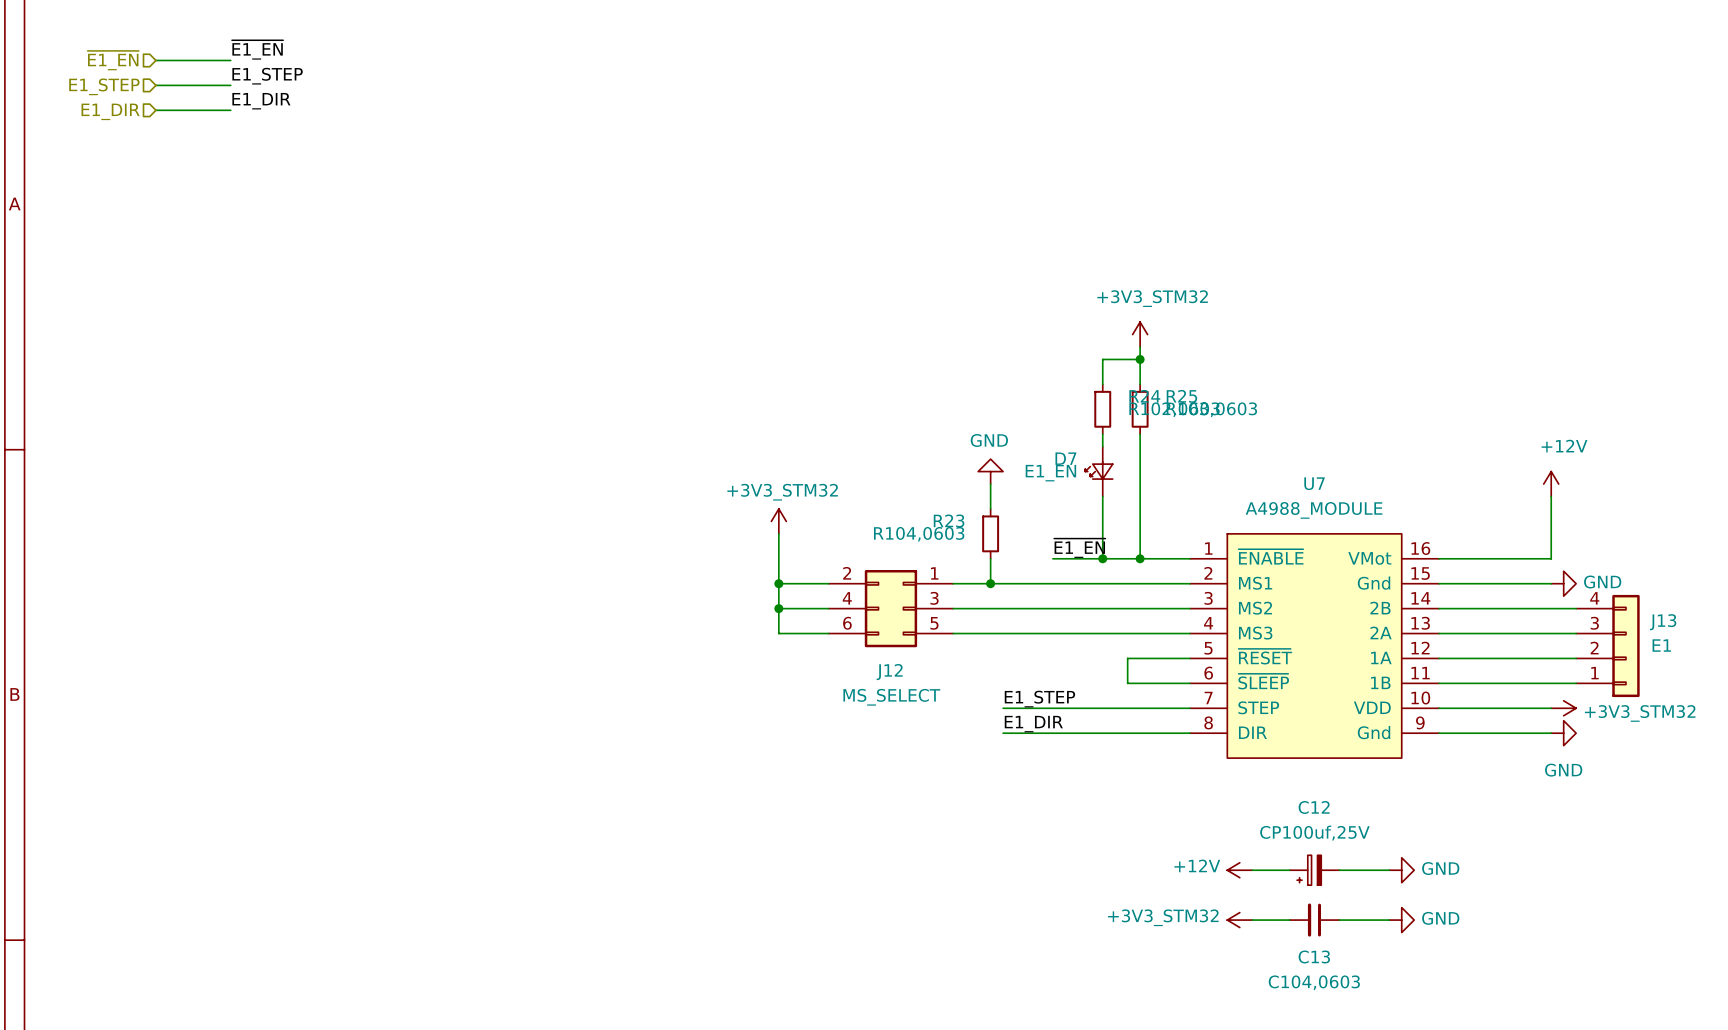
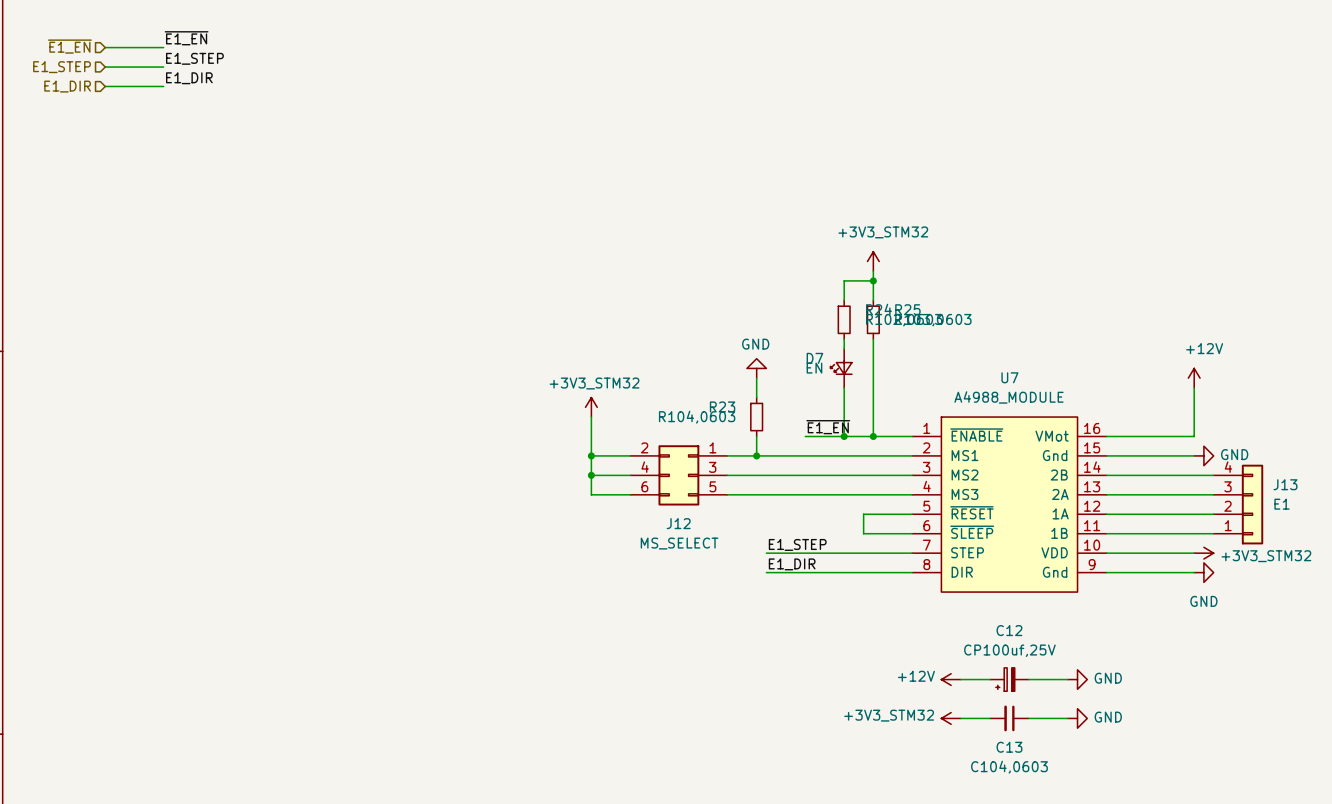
D7 value: E1_EN (1050, 473) -> EN (814, 368)

